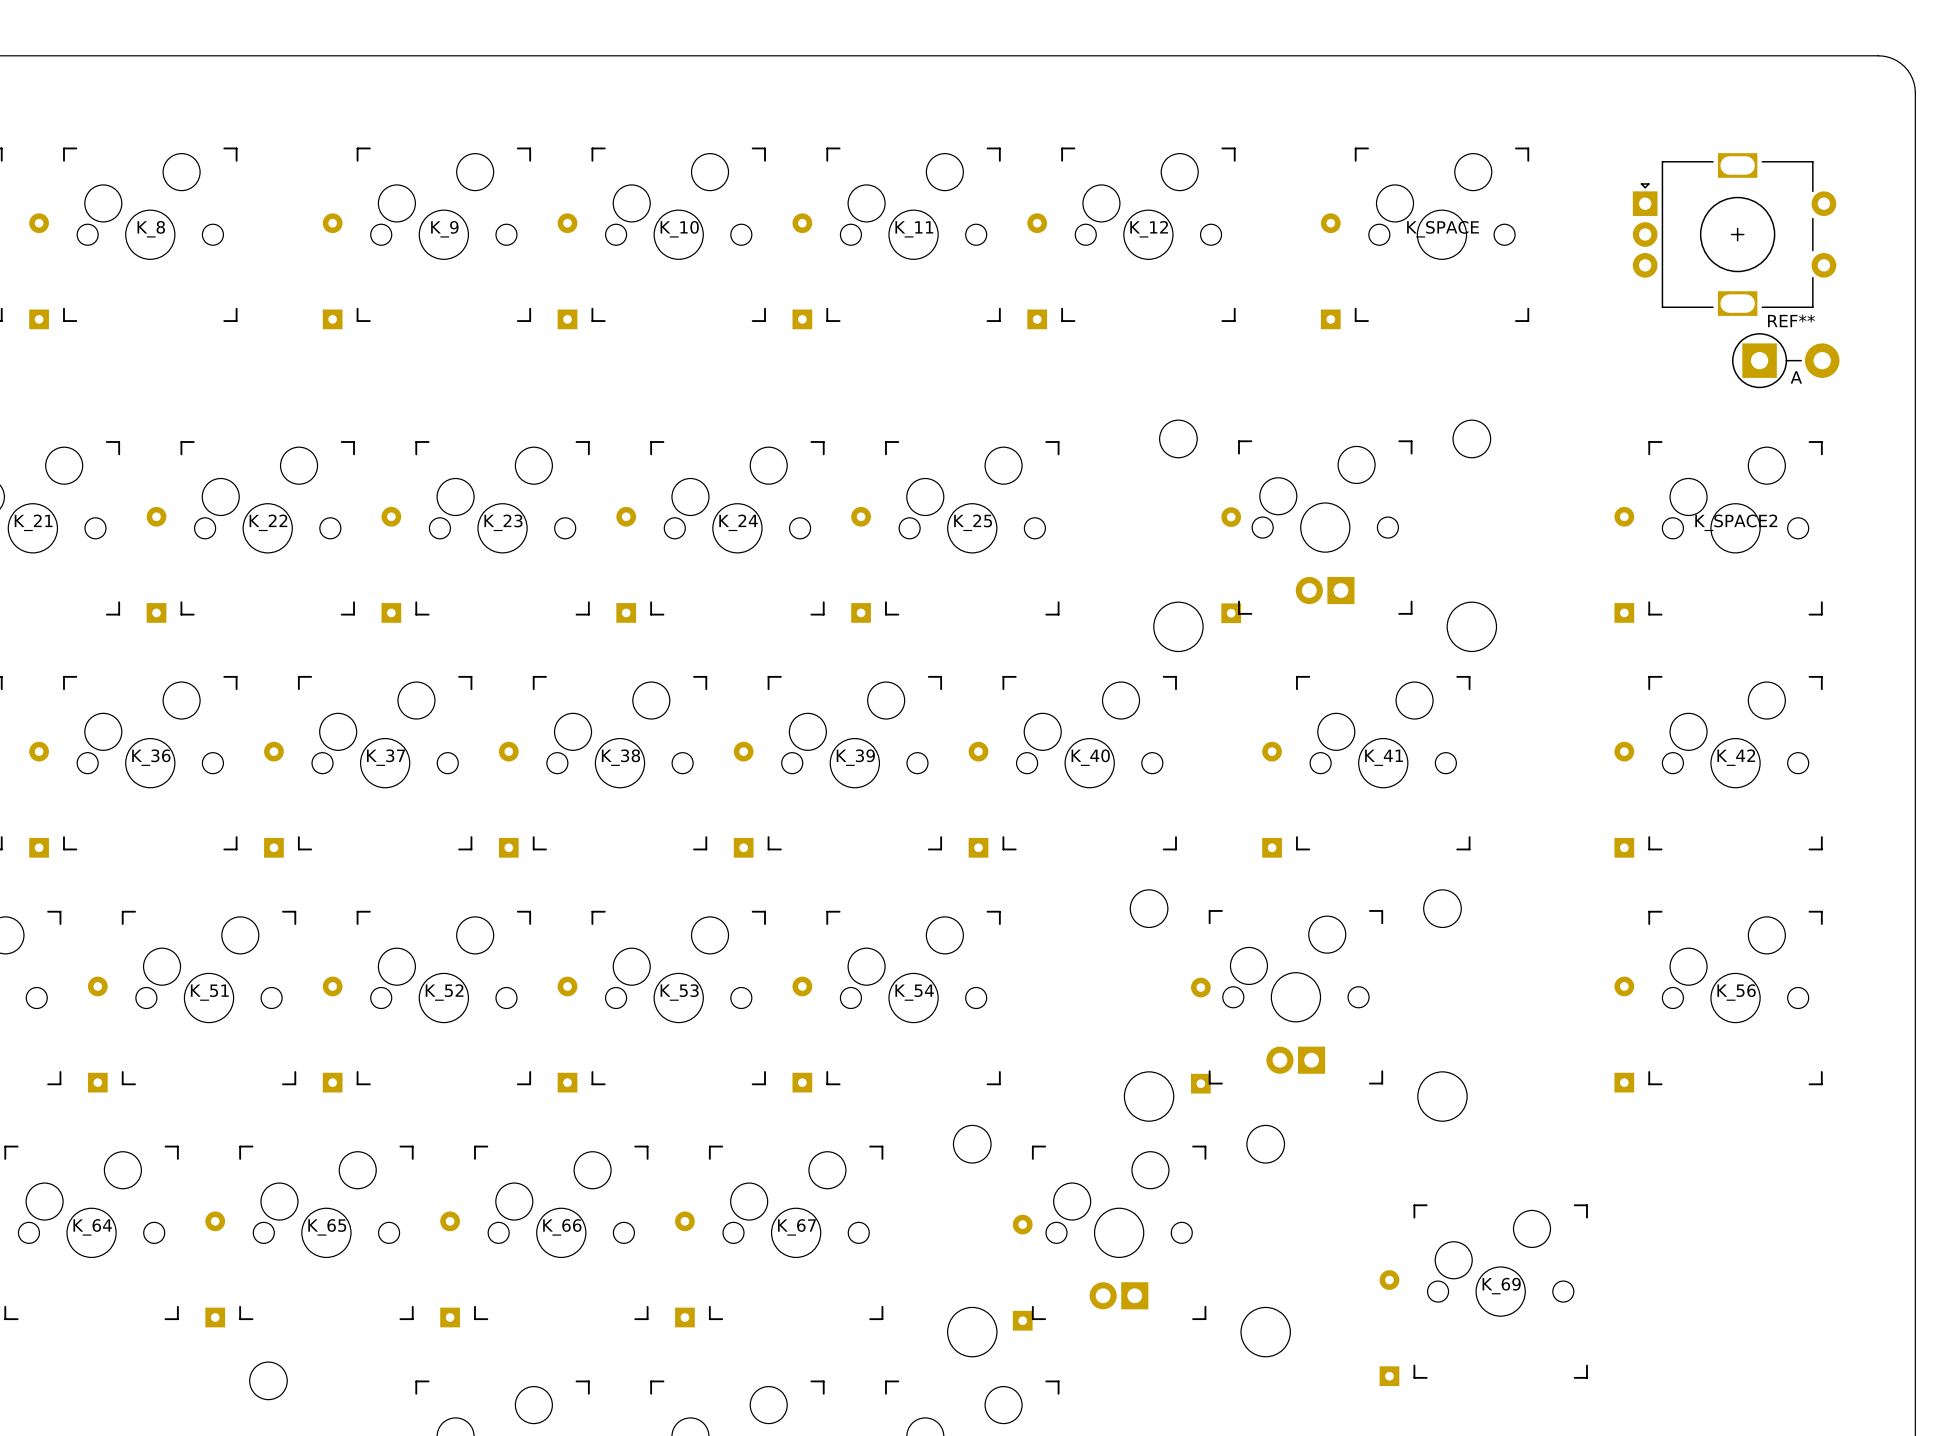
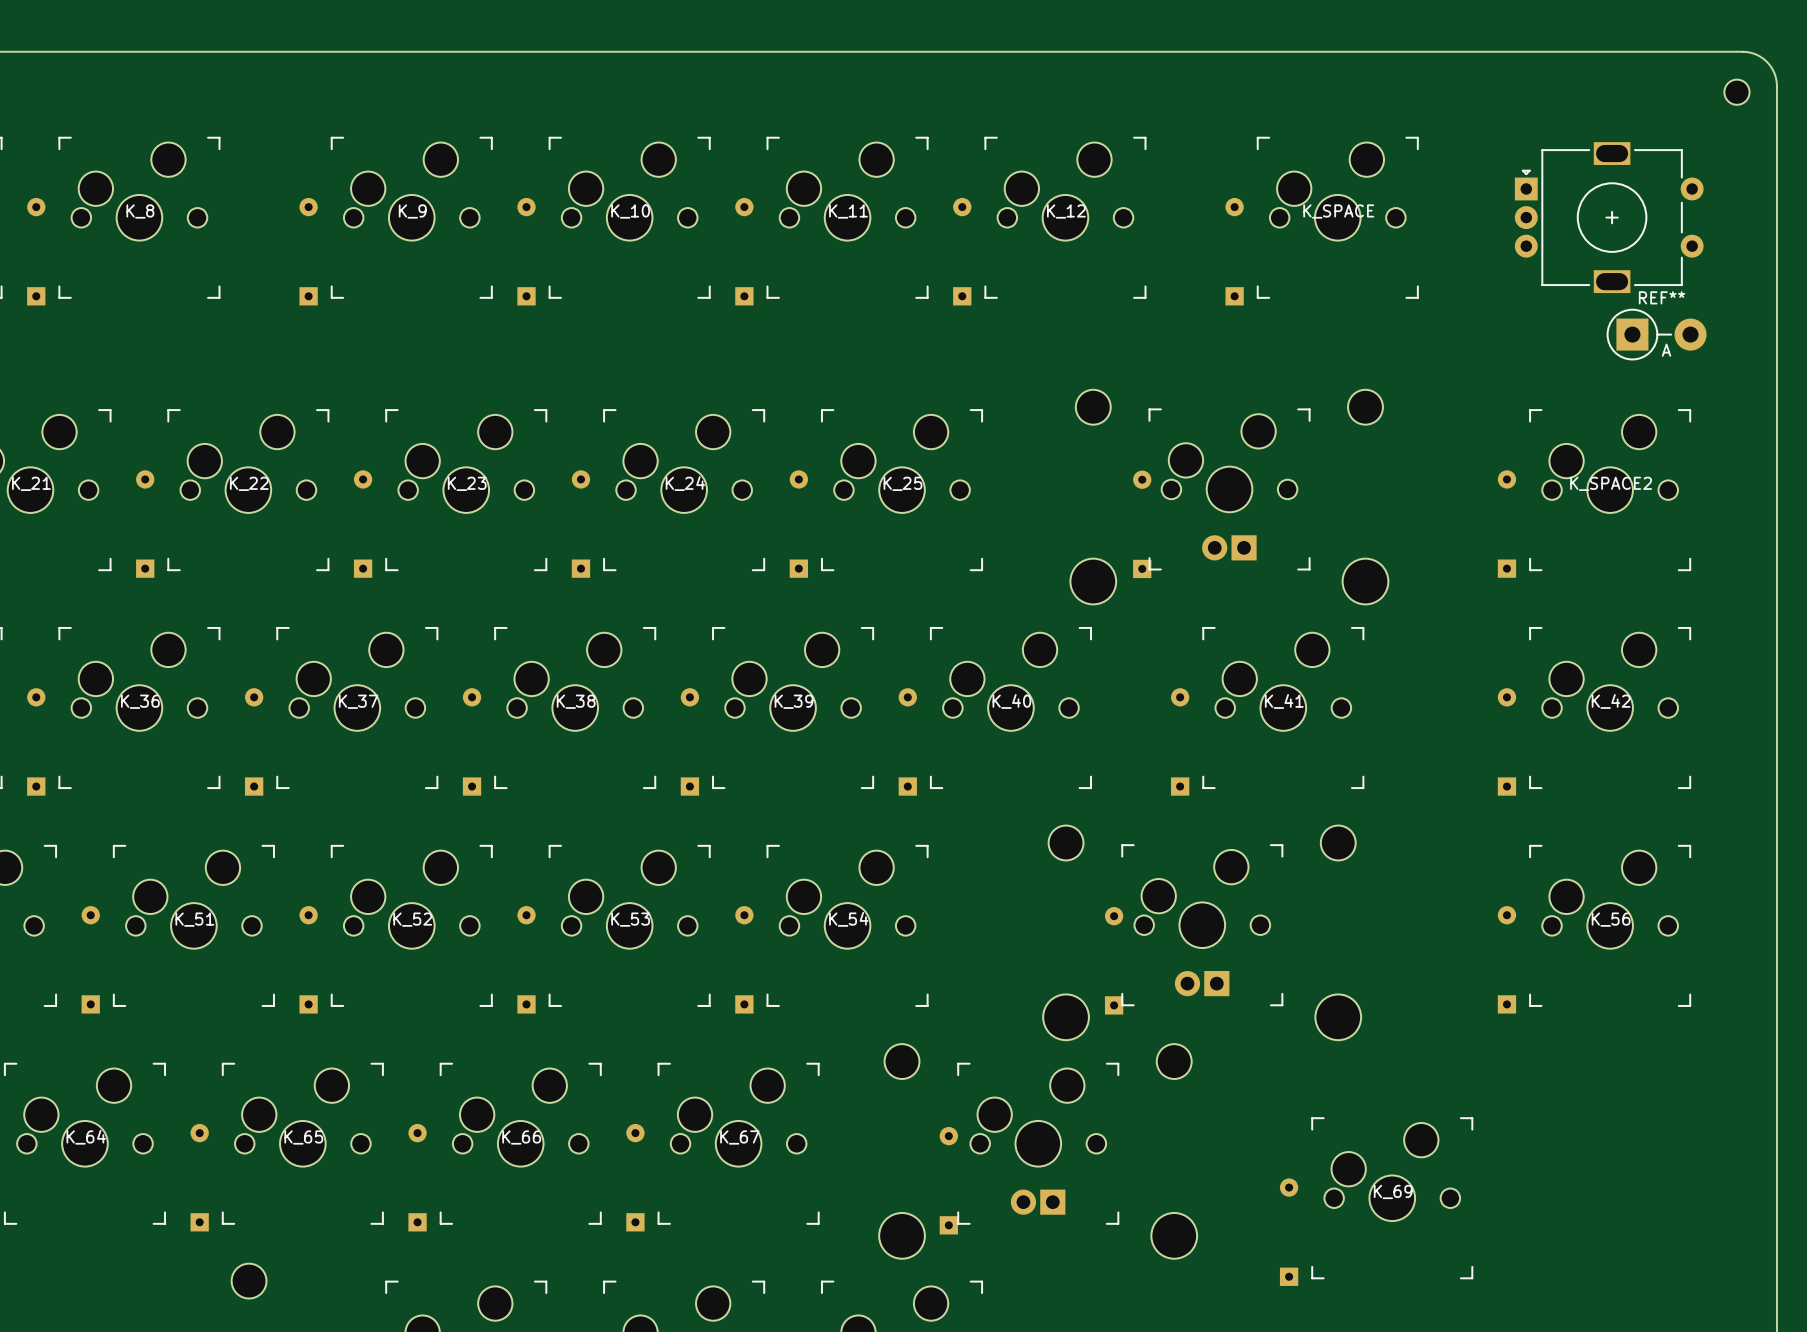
part: none -> (1736, 92)

